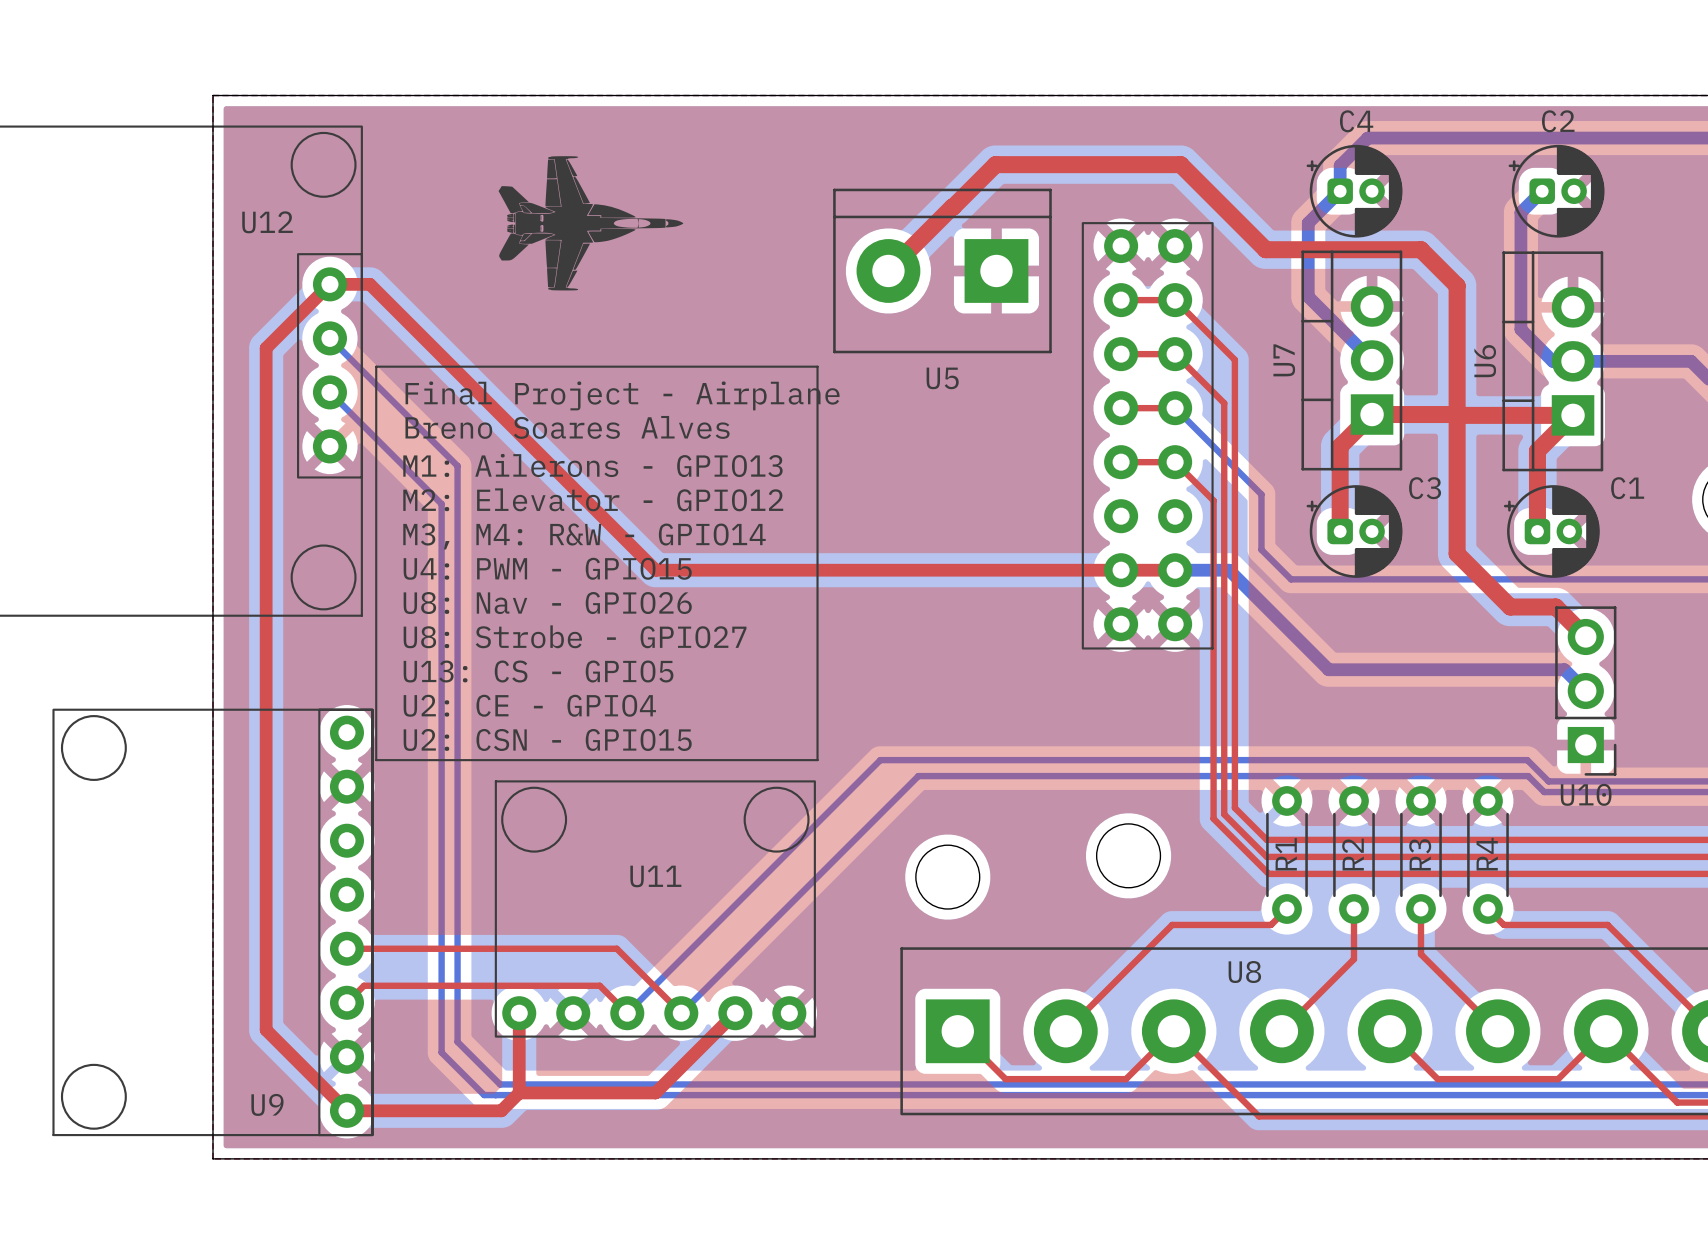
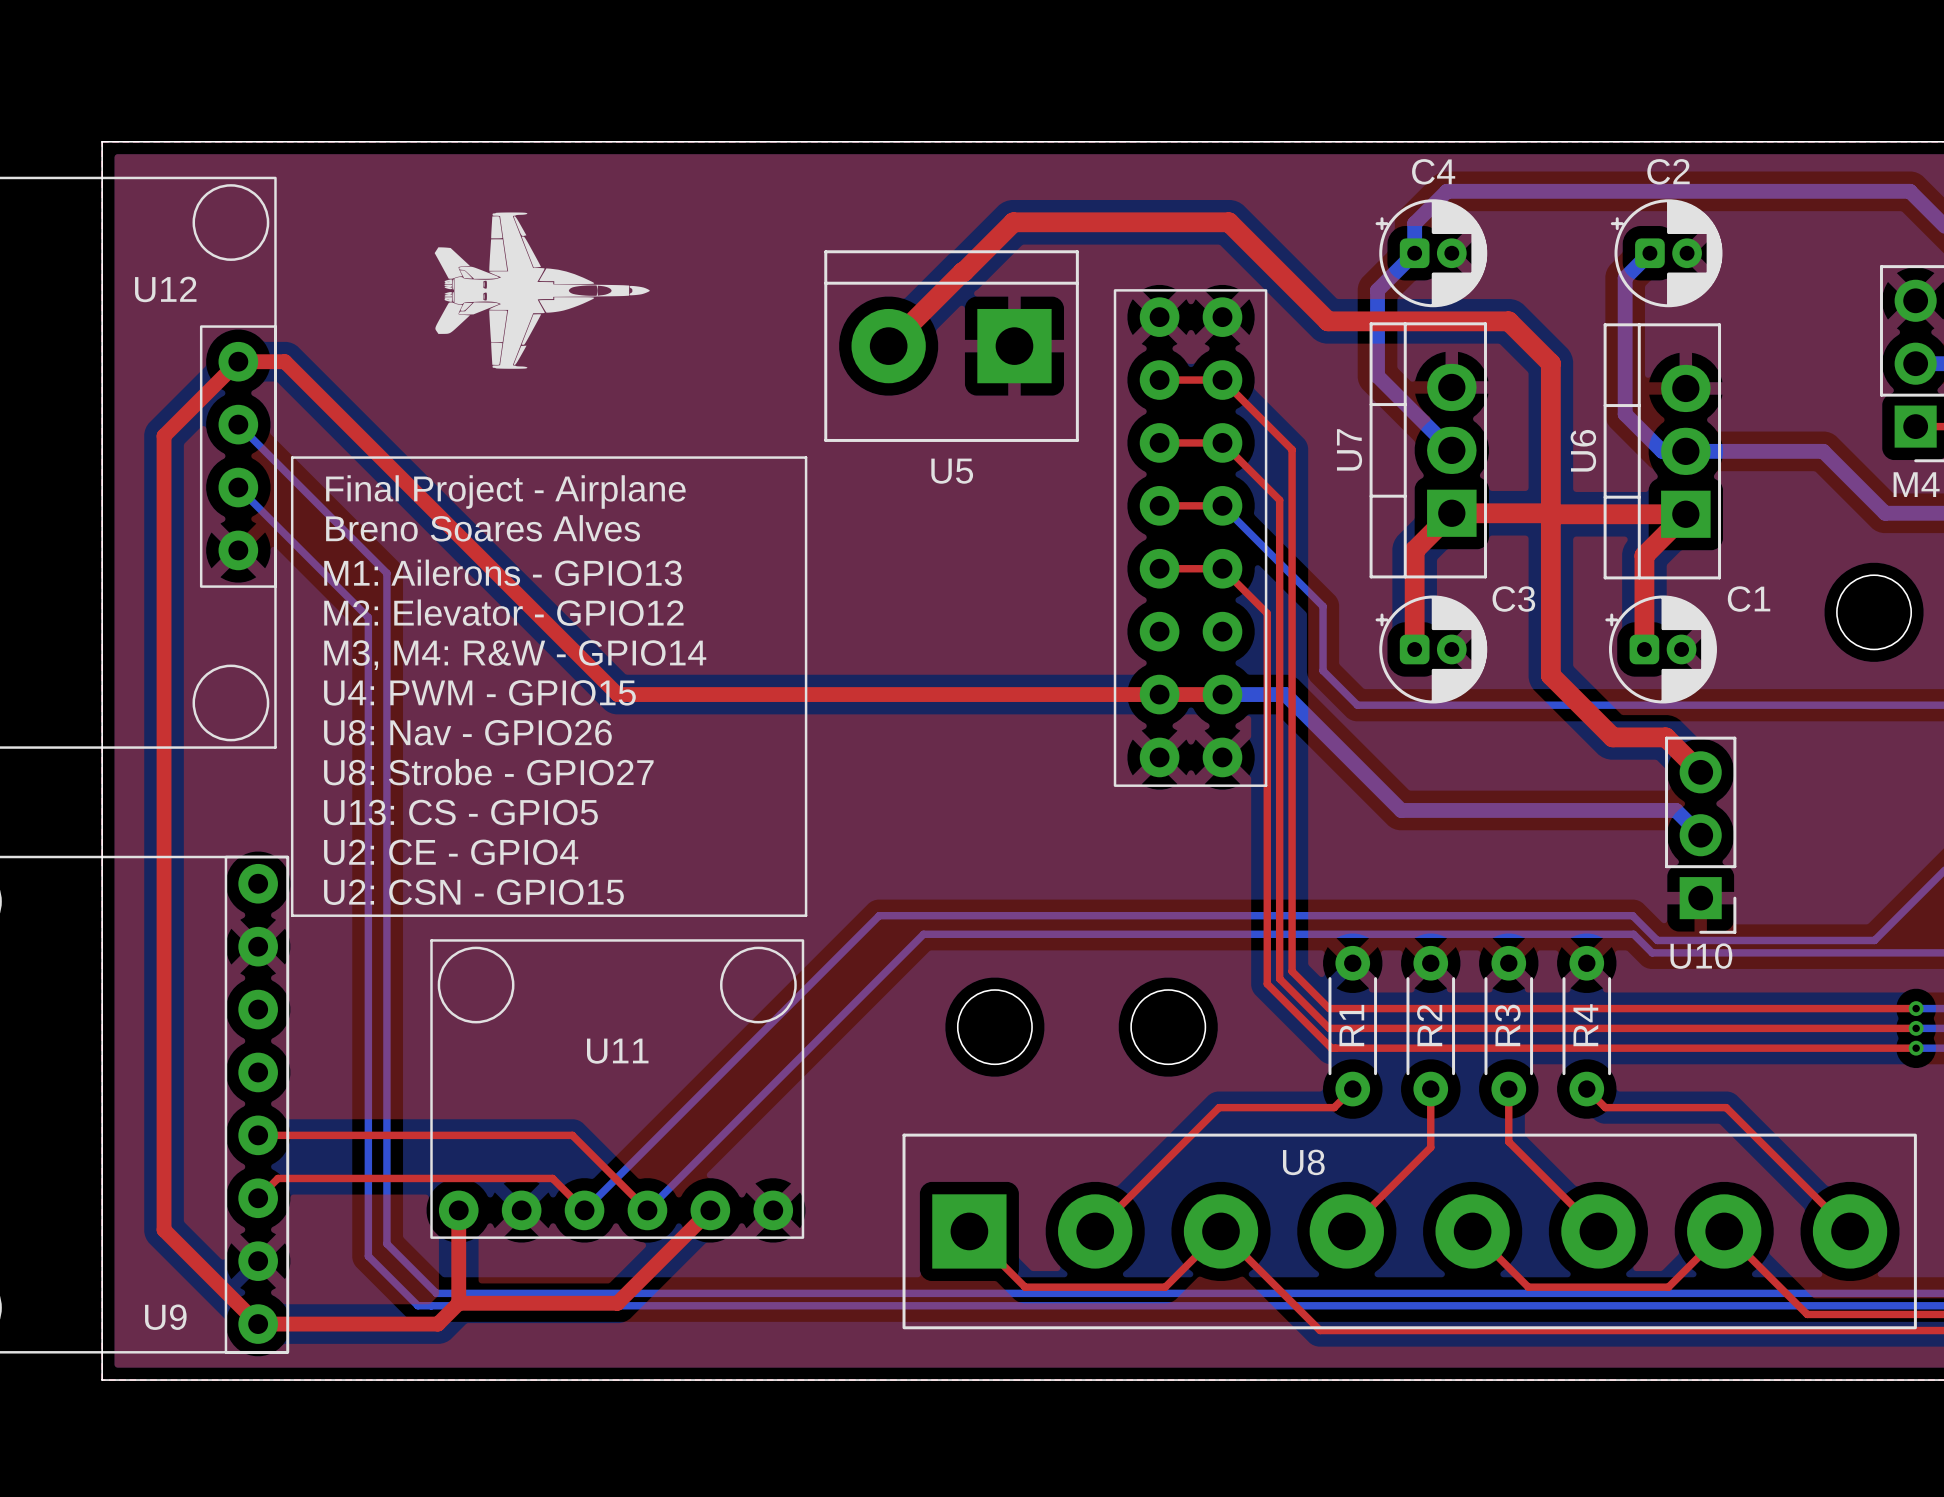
round board edge position: (947, 877) -> (994, 1027)

